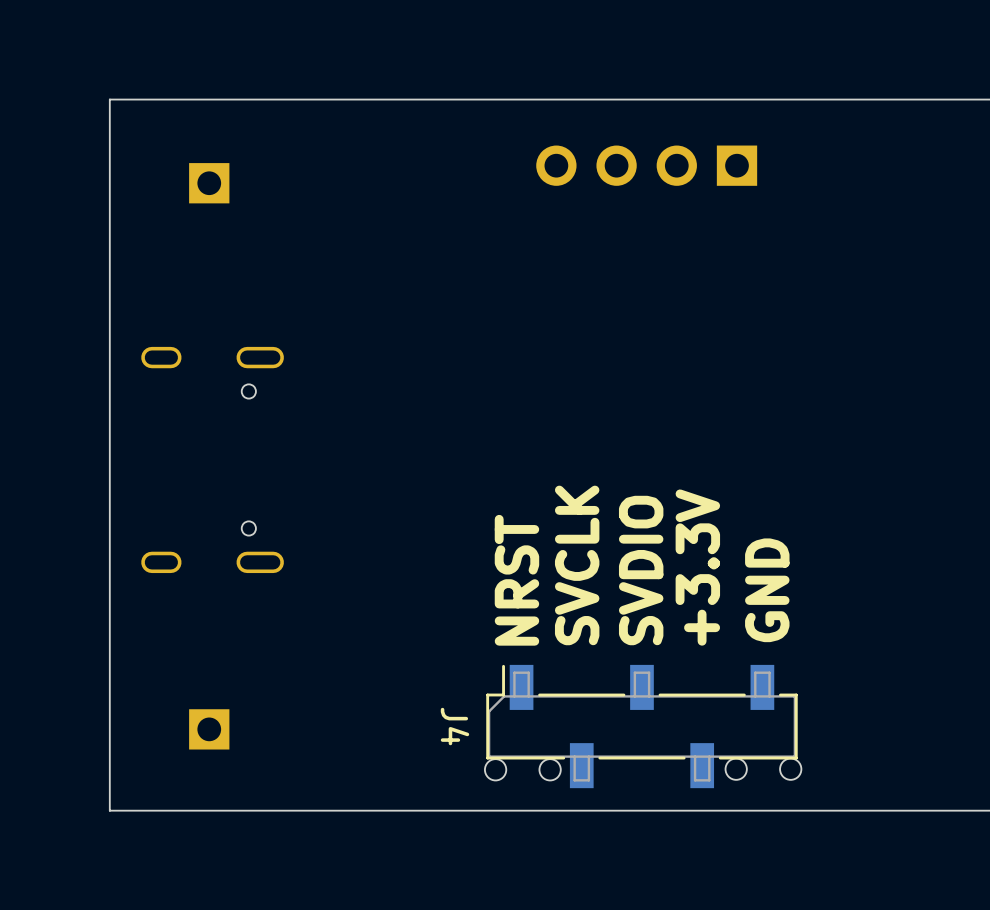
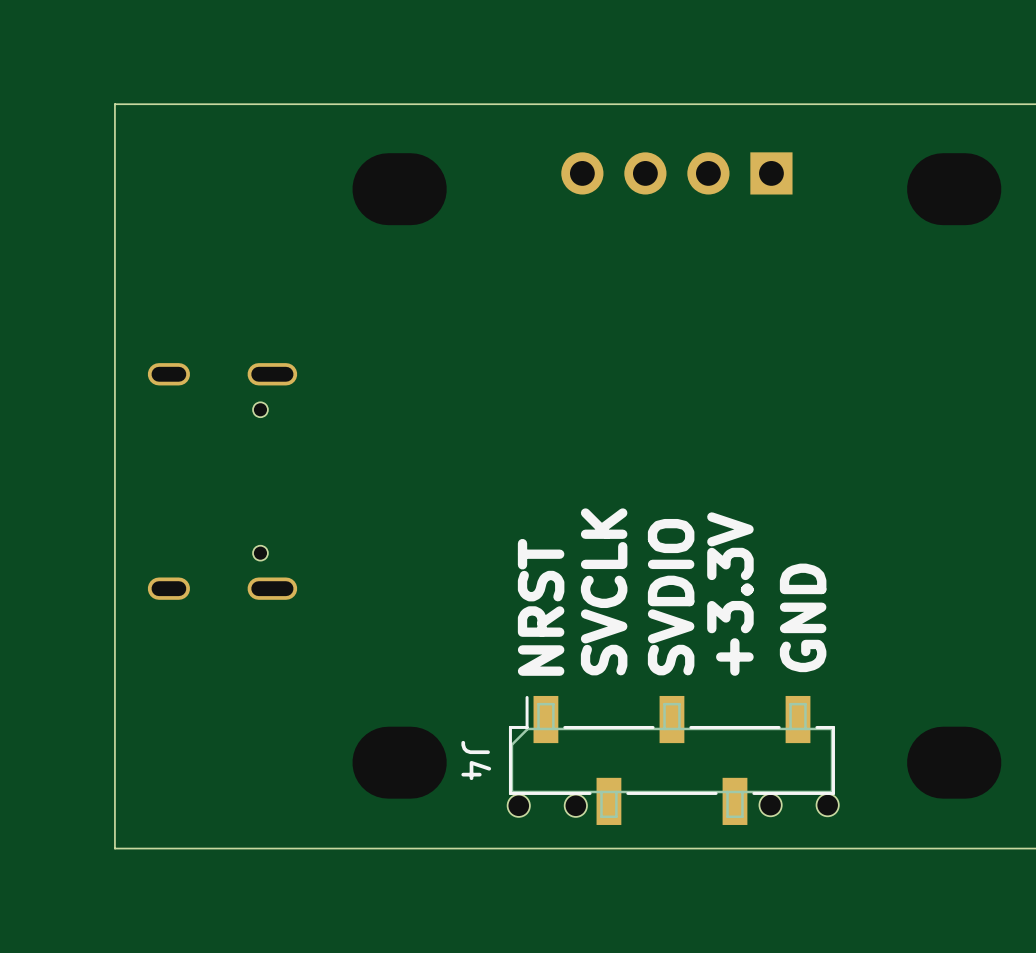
part: (209, 183) -> none
part: (209, 729) -> none

